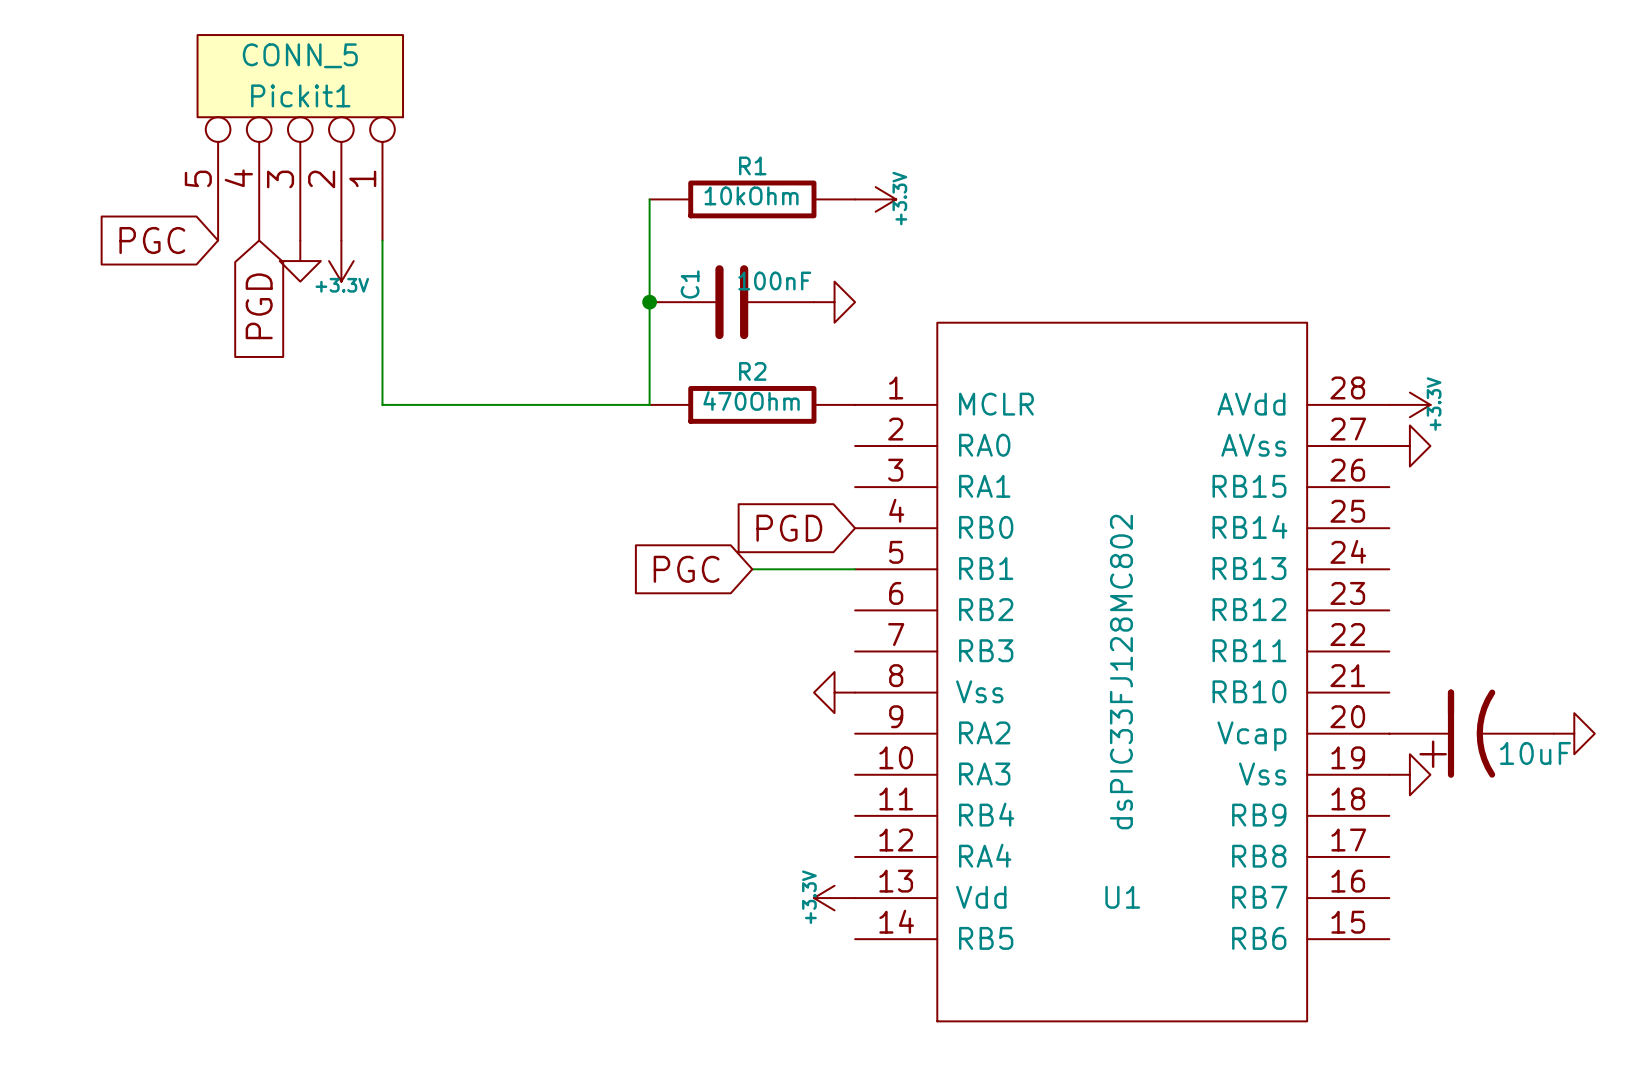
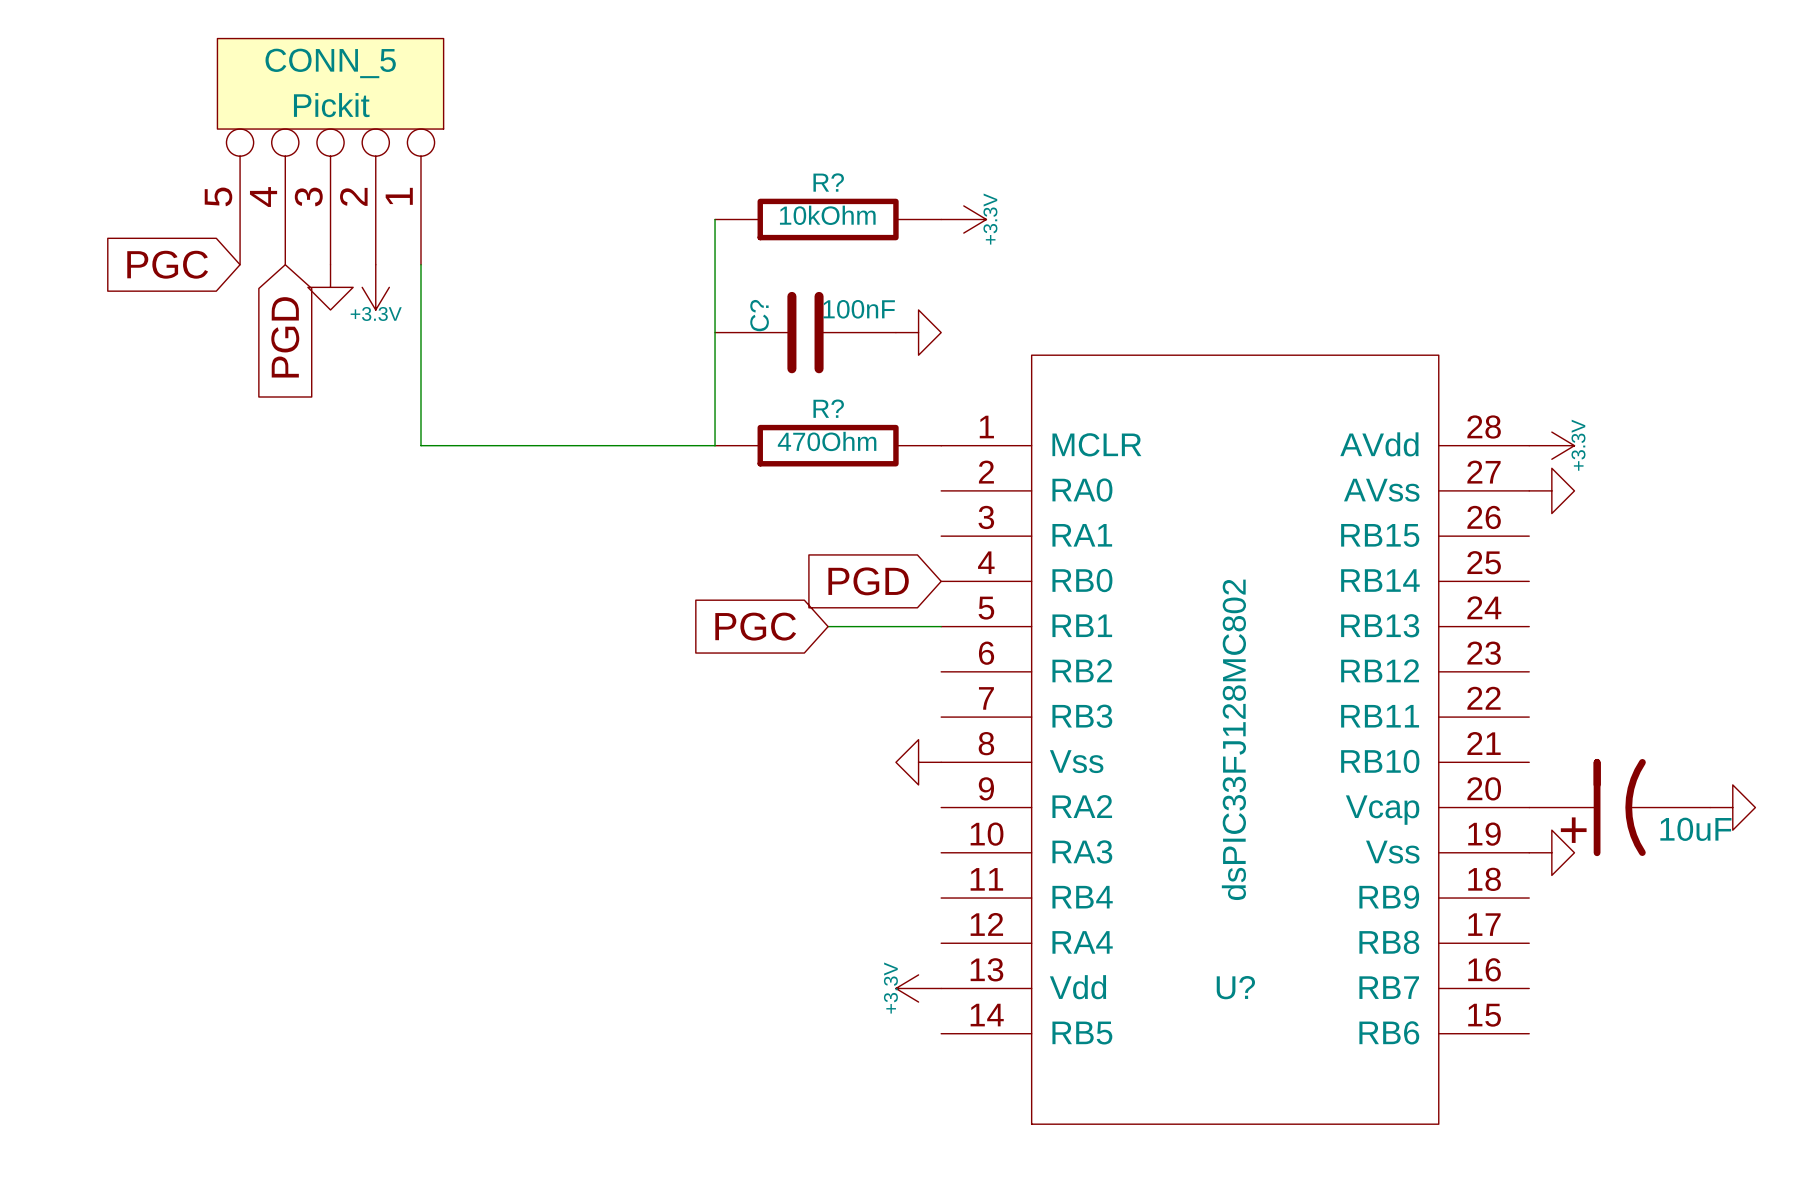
Pickit1 name: Pickit1 (300, 95) -> Pickit (331, 105)
R1 name: R1 (752, 165) -> R? (828, 182)
C1 name: C1 (690, 284) -> C? (759, 315)
junction: (649, 302) -> none
R2 name: R2 (752, 371) -> R? (828, 408)
U1 name: U1 (1122, 897) -> U? (1235, 987)

